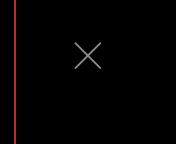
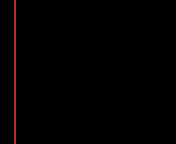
no-connect mark: (87, 55) -> none

